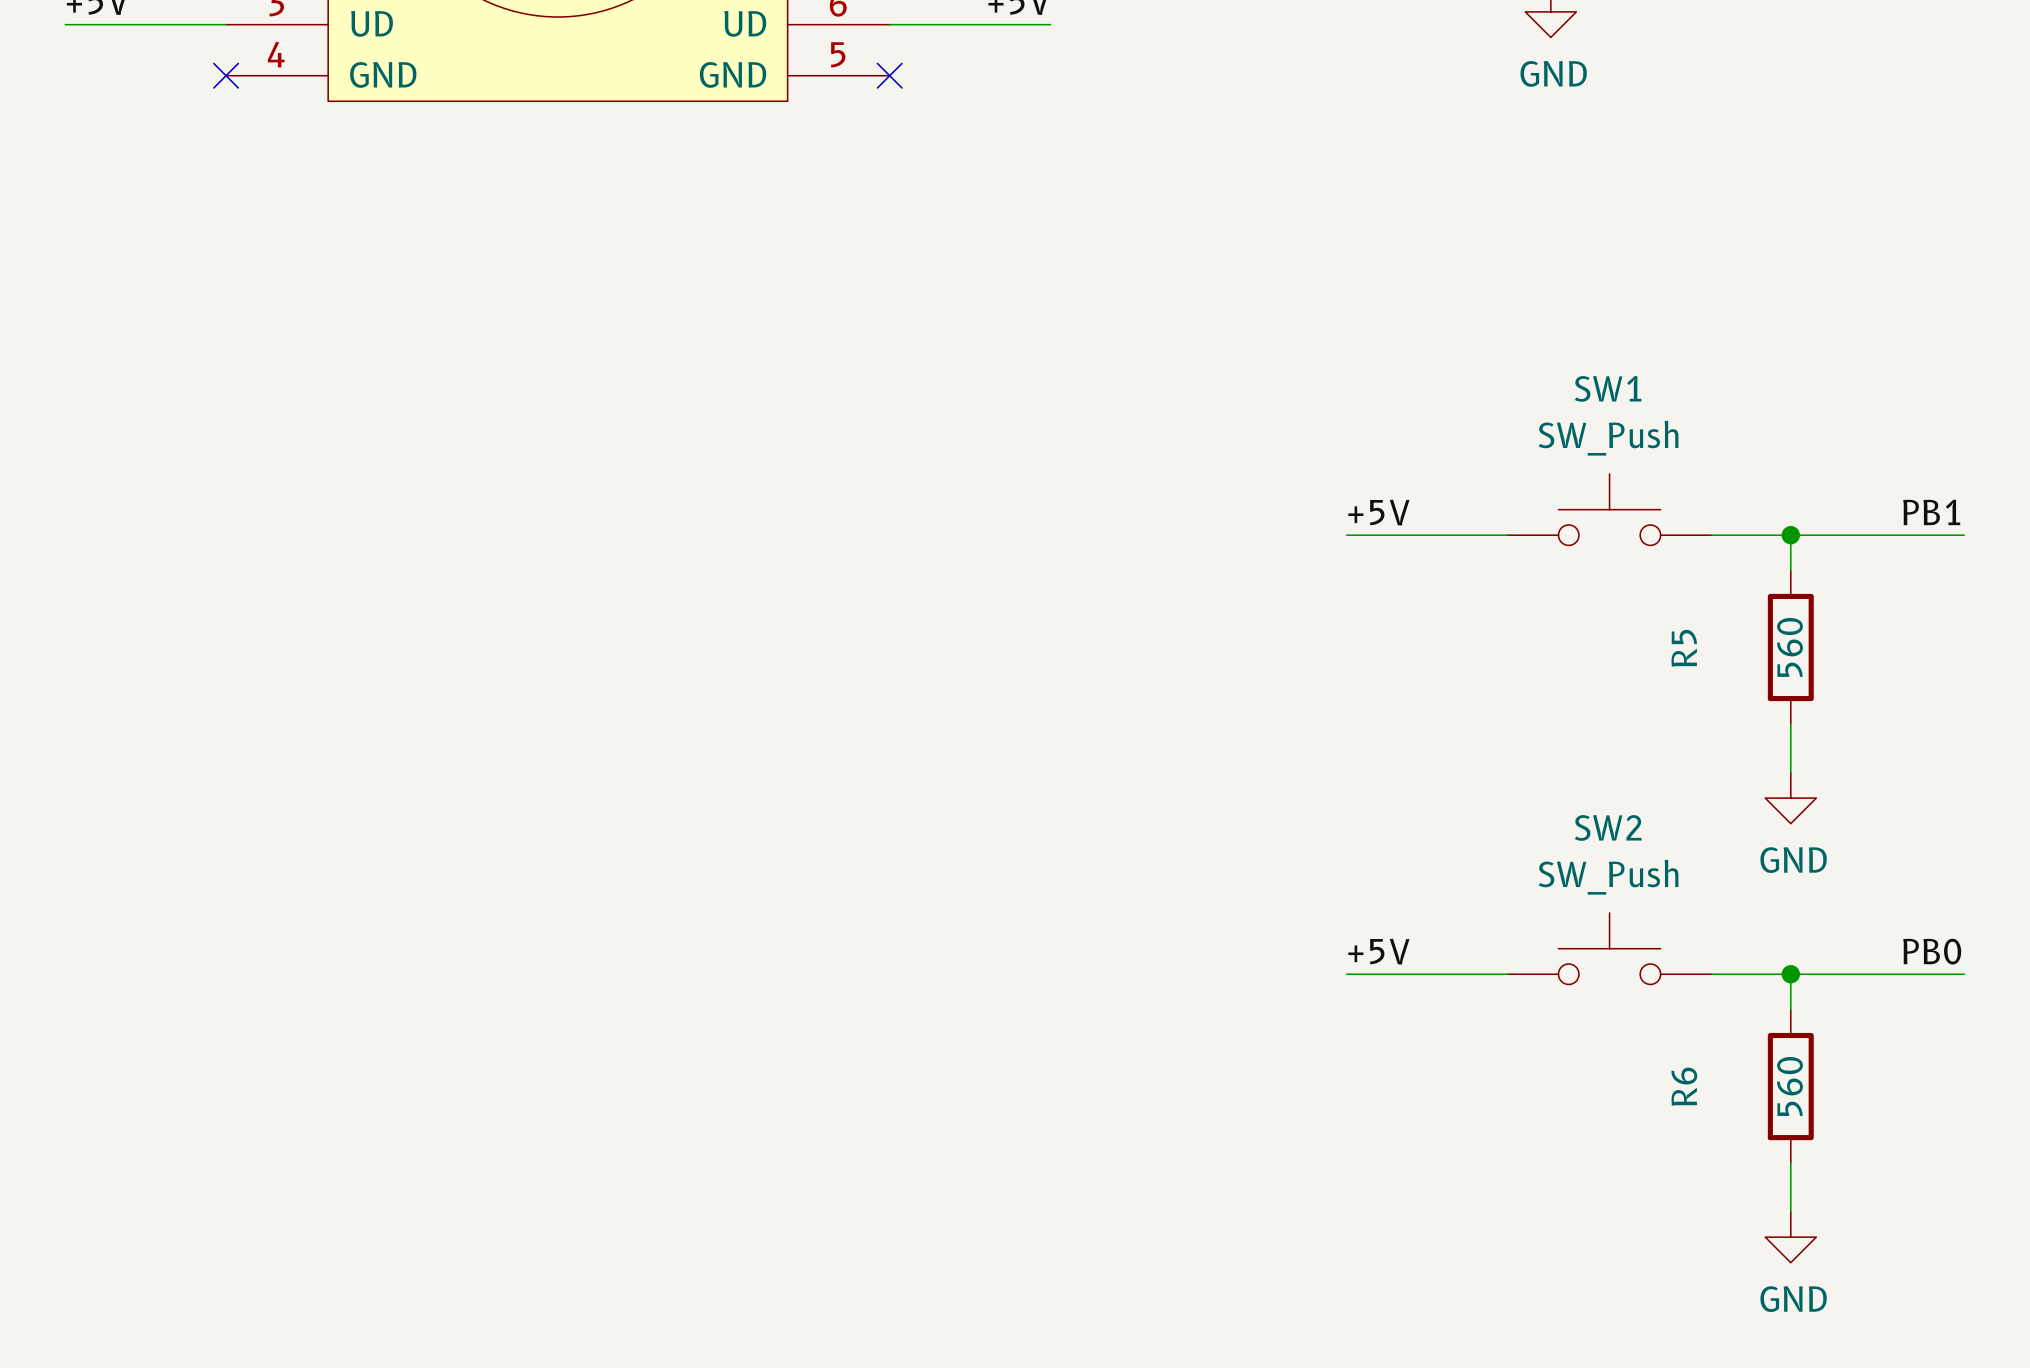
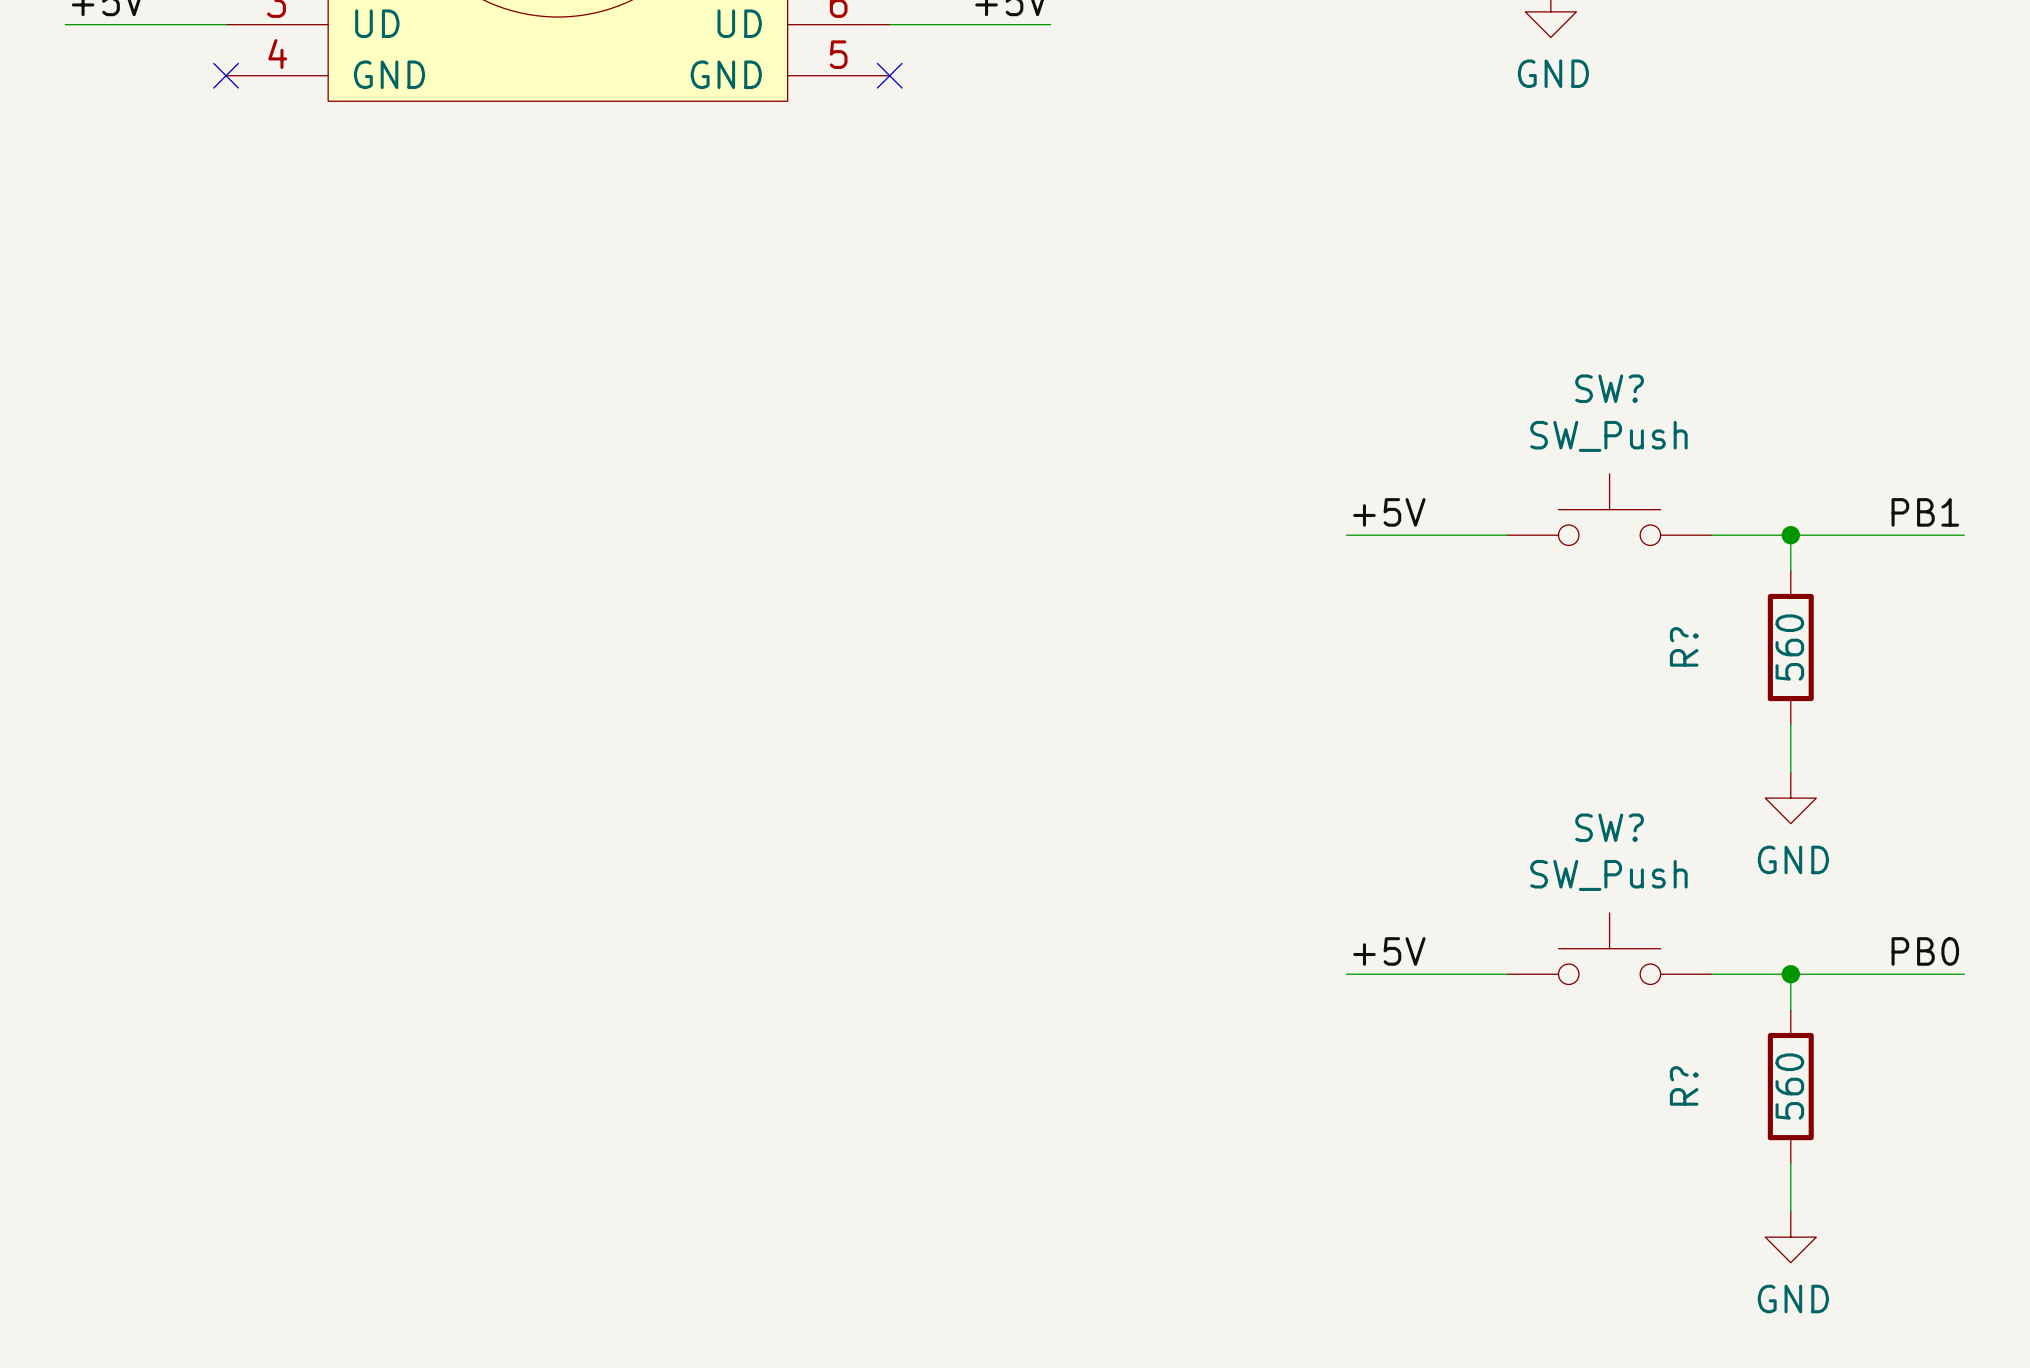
SW1 name: SW1 (1608, 388) -> SW? (1609, 388)
R5 name: R5 (1684, 648) -> R? (1684, 646)
SW2 name: SW2 (1608, 827) -> SW? (1609, 827)
R6 name: R6 (1684, 1086) -> R? (1684, 1085)

